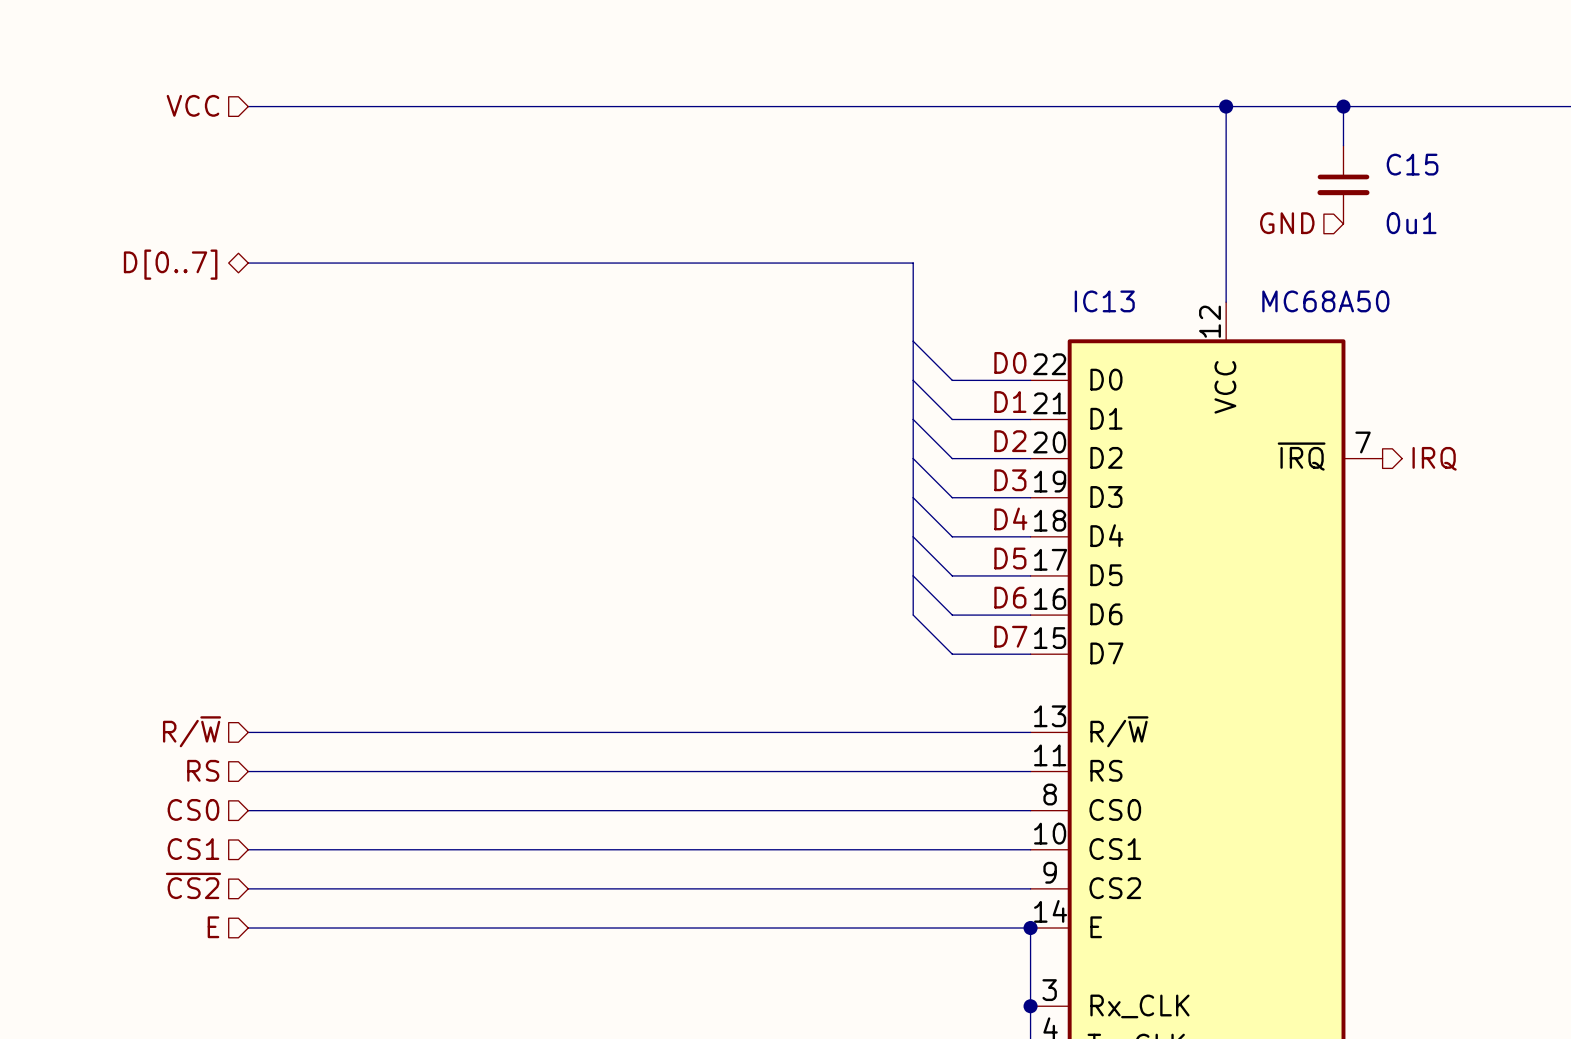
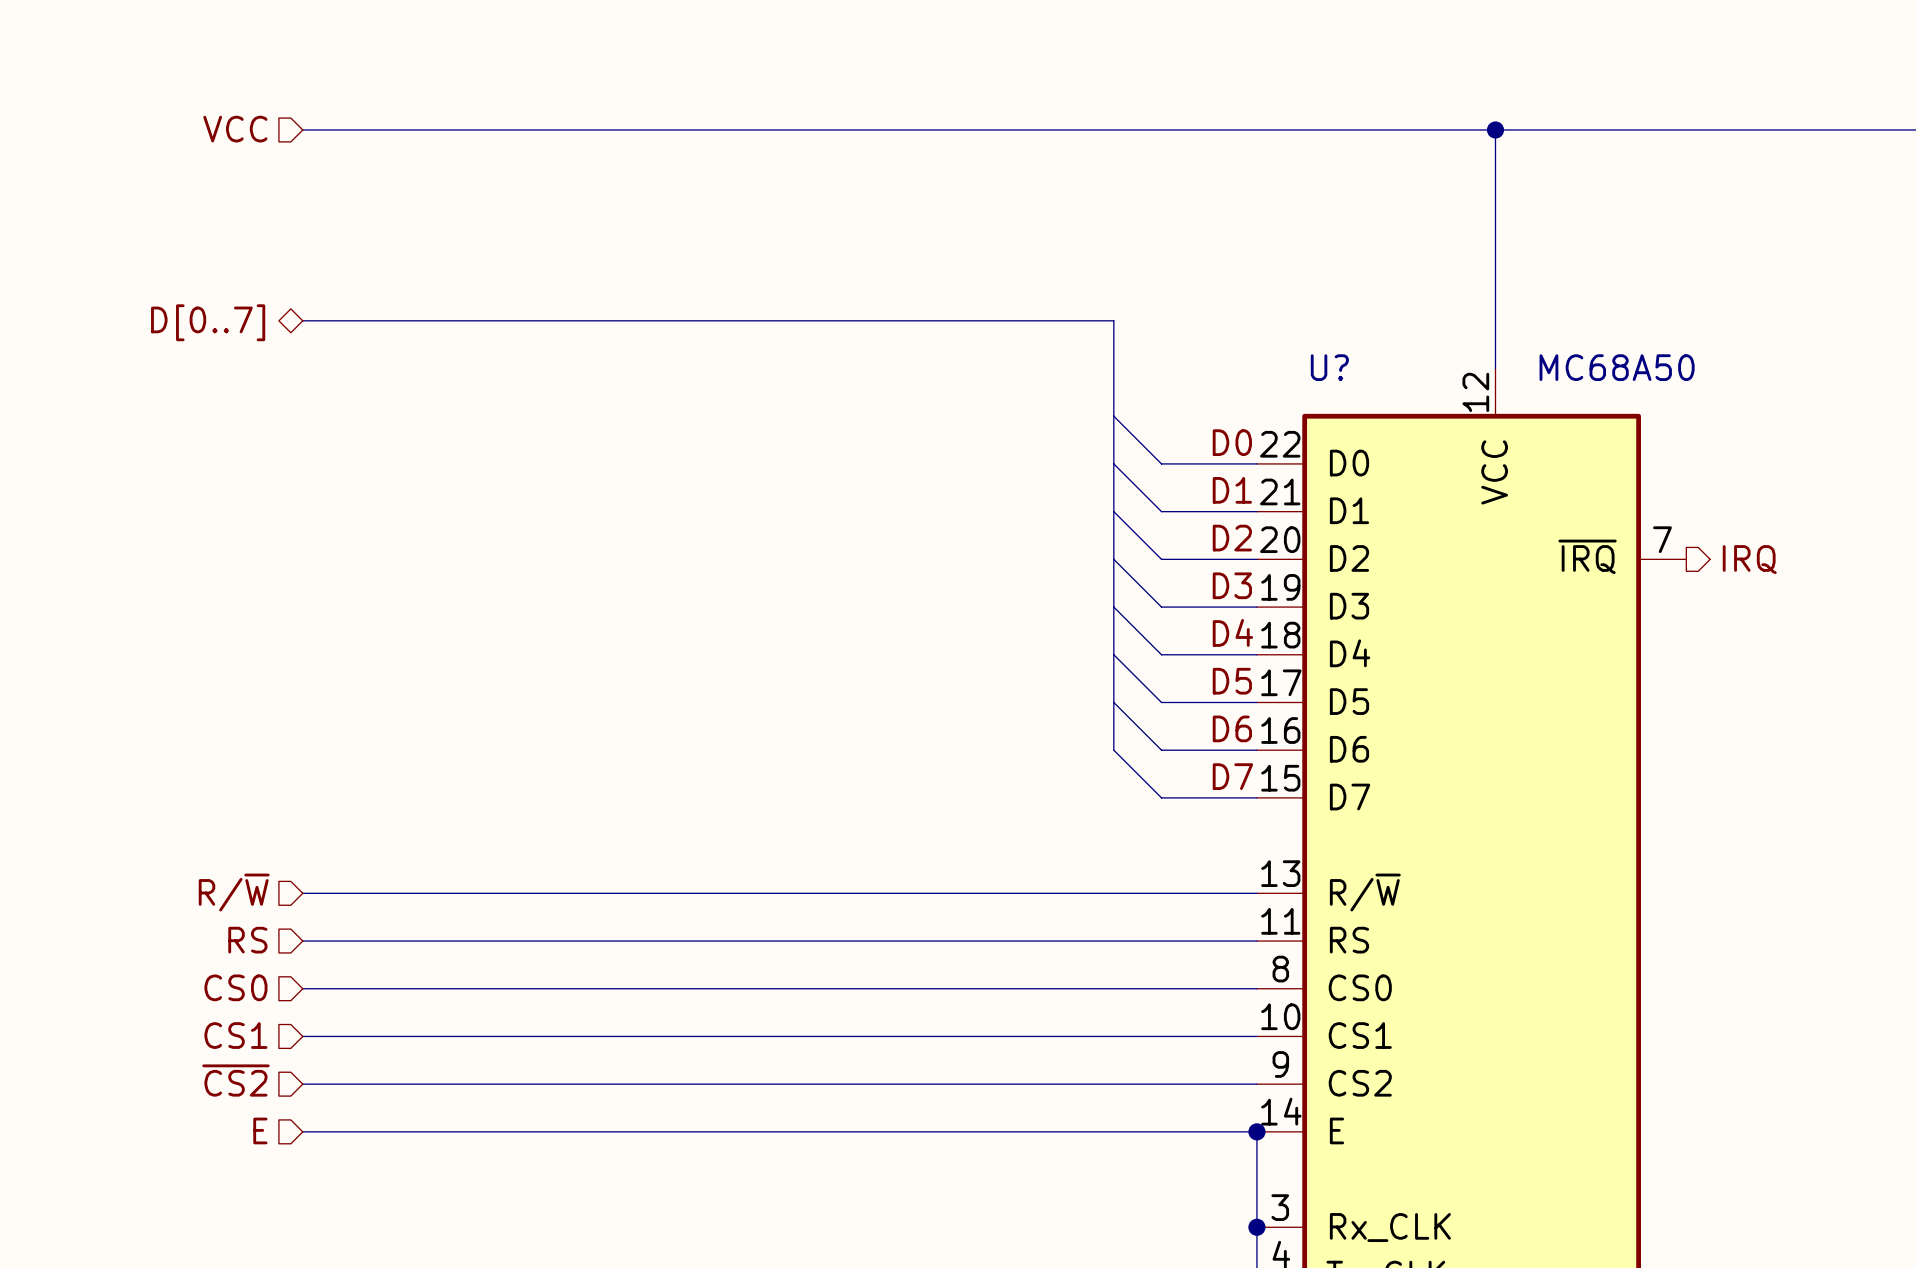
wire: (1343, 106) (1343, 145) -> none
junction: (1343, 106) -> none
C15: 0u1 (1343, 184) -> none
hierarchical label: GND (1287, 223) -> none
IC13 name: IC13 (1104, 301) -> U? (1329, 367)

